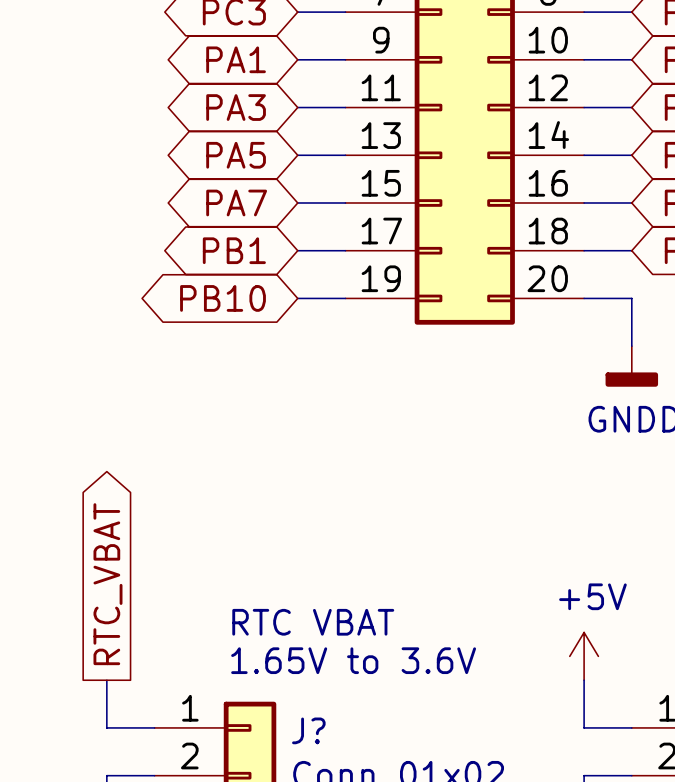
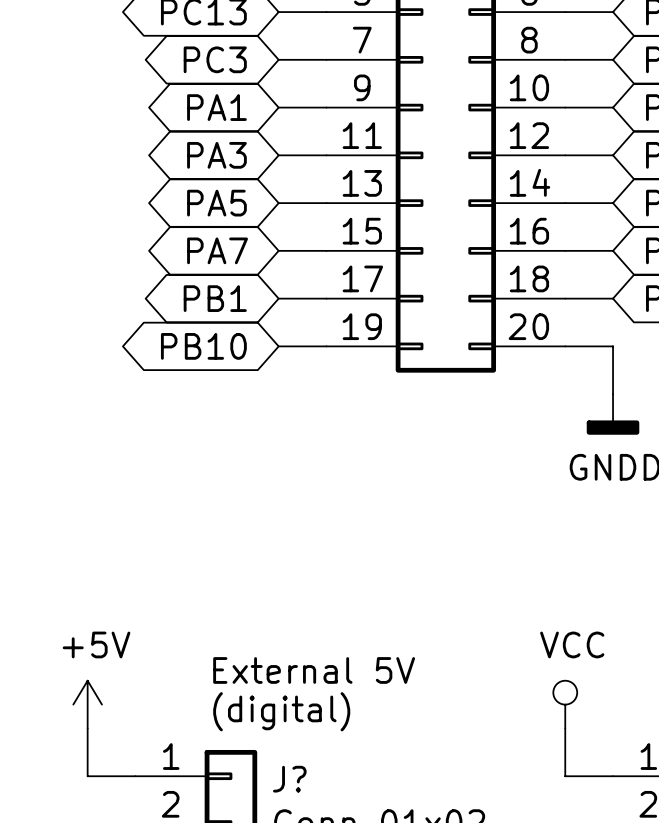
global label: RTC_VBAT (107, 584) -> none
text: RTC VBAT (313, 622) -> External 5V (314, 670)
power symbol: none -> +5V (87, 704)
power symbol: +5V (584, 656) -> VCC (565, 704)
text: 1.65V to 3.6V (353, 660) -> (digital) (281, 711)

